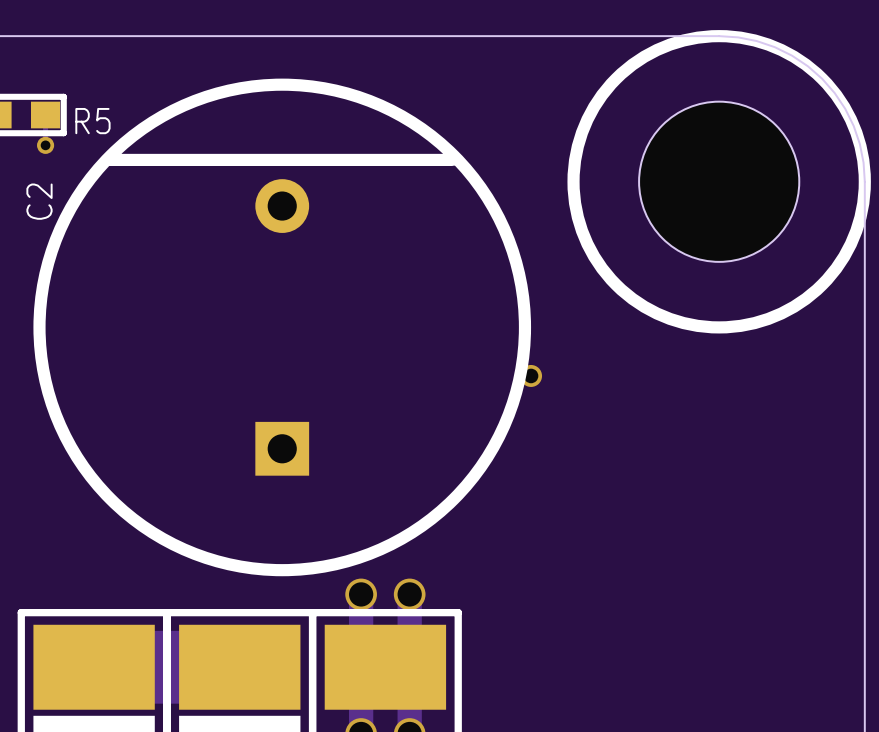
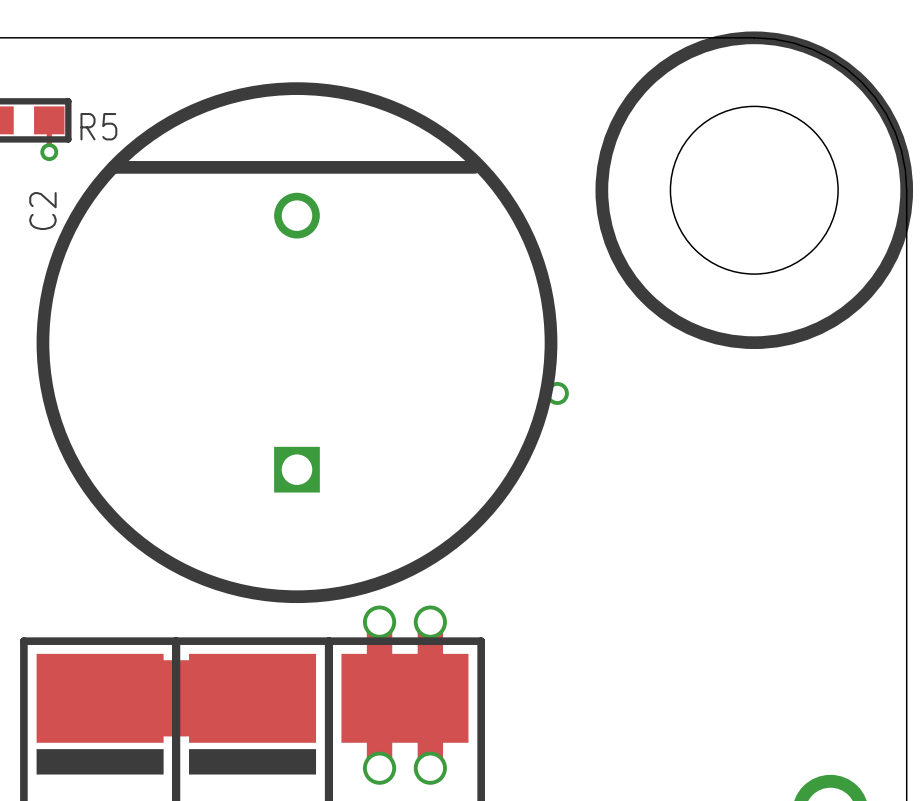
C2 footprint: [33, 78, 532, 577] -> [36, 82, 558, 604]

